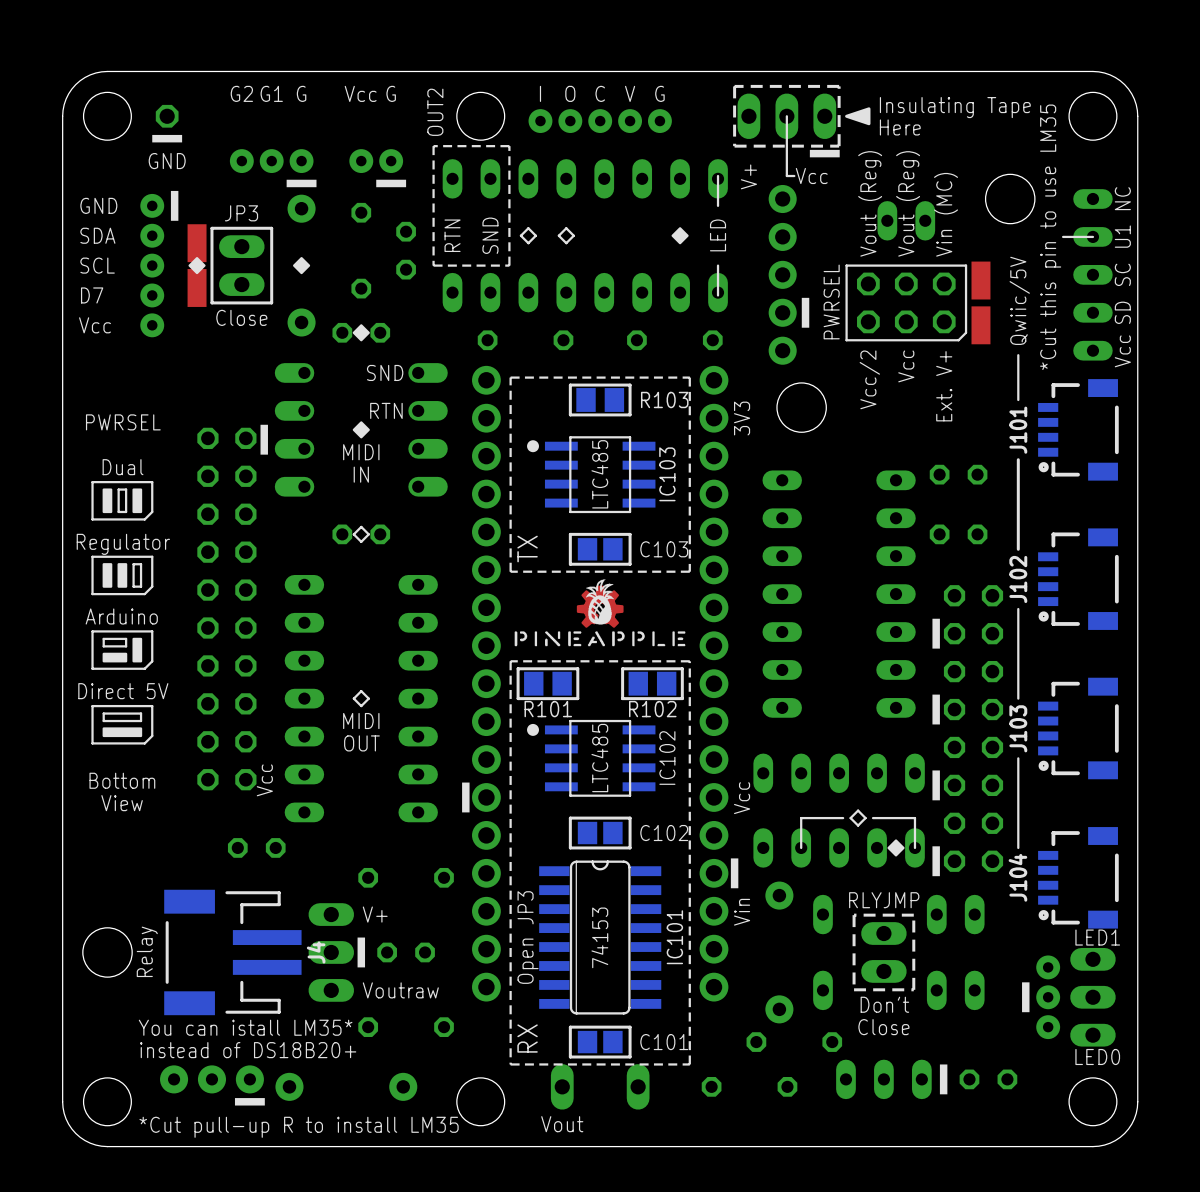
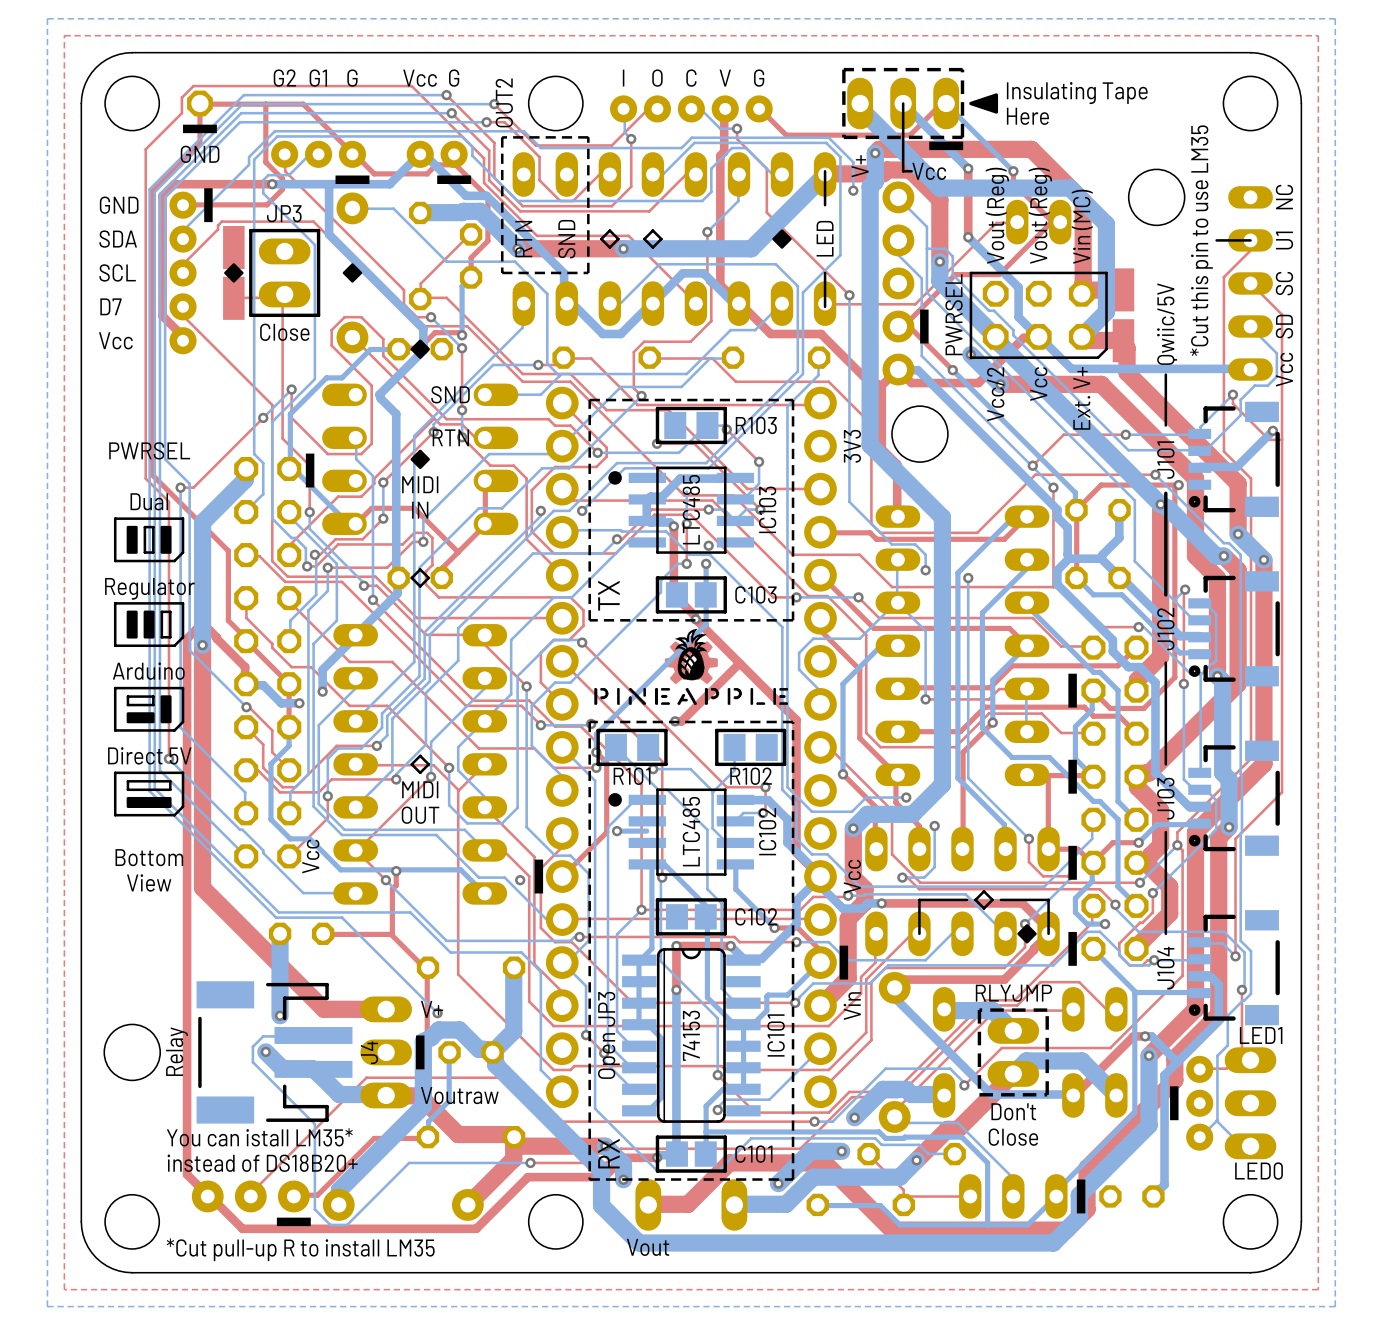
bottom zone outline: none -> (1335, 18) (47, 18) (47, 1306) (1335, 1306) (1335, 18)
top zone outline: none -> (1318, 35) (64, 35) (64, 1289) (1318, 1289) (1318, 35)
top track: none -> (446, 95) (494, 142) (494, 177) (522, 206) (611, 206) (631, 186) (631, 139)
bottom track: none -> (446, 95) (243, 95) (149, 189) (149, 791) (276, 917) (342, 917) (437, 1013)
via: none -> (446, 95)
top track: none -> (265, 104) (265, 162) (282, 179) (282, 189) (267, 204) (183, 205)
top track: none -> (494, 104) (535, 145) (611, 145) (648, 109) (657, 108)
bottom track: none -> (494, 104) (242, 104) (154, 191) (154, 788) (278, 912) (410, 912) (450, 952) (521, 952) (540, 971) (540, 1069) (562, 1091)
via: none -> (494, 104)
bottom track: none -> (860, 103) (861, 109) (939, 188) (1070, 188) (1106, 224) (1106, 312) (1081, 336)
bottom track: none -> (903, 103) (968, 168)
top track: none -> (946, 103) (941, 104) (910, 135) (786, 135) (759, 108)
bottom track: none -> (946, 103) (1013, 171)
bottom track: none -> (623, 108) (624, 132) (631, 139)
bottom track: none -> (691, 108) (700, 109) (720, 128) (737, 128)
top track: none -> (725, 108) (724, 151) (720, 155) (720, 284) (770, 333) (821, 333) (871, 384) (881, 385)
top track: none -> (451, 113) (489, 150) (489, 180) (520, 211) (649, 211) (685, 175) (695, 174)
bottom track: none -> (451, 113) (241, 113) (159, 194) (159, 770) (246, 856)
via: none -> (451, 113)
top track: none -> (486, 122) (504, 122) (539, 157) (539, 180) (560, 201) (573, 201) (598, 175) (609, 174)
bottom track: none -> (486, 122) (240, 122) (165, 197) (165, 459) (189, 483) (189, 650) (246, 707)
via: none -> (486, 122)
top track: none -> (737, 128) (737, 139) (766, 168) (766, 212) (849, 295)
via: none -> (737, 128)
via: none -> (631, 139)
top track: none -> (875, 153) (879, 149) (1031, 149) (1083, 201) (1081, 293) (1084, 290) (1123, 290)
bottom track: none -> (875, 153) (875, 181) (870, 186) (870, 445) (942, 517) (942, 784) (912, 814) (867, 814) (853, 828)
via: none -> (875, 153)
top track: none -> (284, 154) (285, 171) (403, 290) (403, 304) (416, 317) (431, 317)
bottom track: none -> (318, 154) (309, 154) (289, 175) (268, 175) (263, 180) (263, 193) (314, 244) (314, 379) (272, 421) (272, 518) (291, 538) (295, 538) (305, 548) (307, 566)
top track: none -> (454, 154) (453, 164) (436, 164) (427, 173) (374, 173) (303, 104) (199, 103) (199, 144) (152, 191) (152, 474) (228, 550) (228, 620) (246, 638) (246, 641)
top track: none -> (454, 154) (454, 163) (487, 197) (487, 241) (471, 257) (471, 277)
top track: none -> (968, 168) (968, 237)
via: none -> (968, 168)
top track: none -> (1013, 171) (1013, 182) (1052, 221) (1059, 222) (1050, 222) (999, 274) (955, 274) (903, 326) (898, 326)
via: none -> (1013, 171)
bottom track: none -> (652, 174) (663, 173) (694, 142) (826, 142) (840, 157) (840, 255) (802, 292) (802, 374) (708, 468) (624, 468) (582, 510)
bottom track: none -> (738, 174) (738, 201) (707, 231)
bottom track: none -> (782, 174) (771, 173) (746, 148) (731, 148) (711, 168) (711, 191) (702, 201) (517, 201) (472, 155) (472, 146) (462, 136) (277, 136) (254, 159) (254, 454) (263, 463) (263, 494) (246, 512)
top track: none -> (825, 174) (883, 173) (886, 170) (910, 170) (939, 199) (939, 261)
bottom track: none -> (825, 174) (751, 248) (623, 248)
top track: none -> (272, 184) (174, 184) (162, 195) (162, 315) (181, 335) (183, 340)
bottom track: none -> (272, 184) (389, 184) (416, 157) (420, 154) (424, 154) (465, 195) (486, 195) (564, 273) (564, 300) (567, 304) (573, 304) (602, 333) (620, 333) (682, 273) (703, 273) (733, 303) (738, 303)
via: none -> (272, 184)
bottom track: none -> (329, 184) (329, 234) (423, 328) (424, 349) (379, 394) (380, 398) (396, 414) (397, 593) (322, 669) (322, 691)
bottom track: none -> (853, 190) (853, 162) (828, 137) (691, 137) (681, 148) (540, 148) (524, 131) (274, 131) (249, 157) (249, 164) (183, 230) (183, 239)
via: none -> (853, 190)
bottom track: none -> (898, 197) (926, 226) (926, 292) (1134, 500) (1134, 561) (1192, 619) (1199, 620)
bottom track: none -> (352, 208) (393, 208) (446, 261) (515, 261) (547, 293) (547, 363) (559, 375)
bottom track: none -> (420, 212) (480, 211) (517, 248)
top track: none -> (1017, 222) (996, 222) (915, 304) (825, 303)
top track: none -> (707, 231) (707, 282) (711, 286) (711, 321) (690, 341) (644, 341) (633, 352) (633, 388) (641, 395)
via: none -> (707, 231)
top track: none -> (471, 234) (420, 283) (420, 299) (446, 297) (522, 374) (570, 374) (606, 410) (668, 410) (747, 488) (820, 489)
bottom track: none -> (968, 237) (1018, 287) (1018, 317) (1071, 368) (1250, 369)
via: none -> (968, 237)
bottom track: none -> (898, 240) (898, 255) (921, 278) (921, 355) (1053, 487)
top track: none -> (1250, 240) (1249, 251) (1223, 277) (1223, 451) (1251, 478) (1251, 758) (1177, 832) (1177, 845) (1182, 850) (1182, 975) (1110, 1048) (1001, 1048) (964, 1085)
via: none -> (517, 248)
top track: none -> (623, 248) (517, 248)
via: none -> (623, 248)
bottom track: none -> (926, 248) (945, 248) (952, 256) (952, 274) (988, 310) (994, 310) (1013, 330) (1013, 335) (1128, 450) (1205, 450) (1240, 415) (1240, 399) (1254, 385) (1267, 385) (1276, 376) (1276, 353) (1250, 326)
bottom track: none -> (939, 261) (939, 281) (995, 336) (1000, 344) (1160, 504) (1168, 508) (1216, 556) (1223, 556)
via: none -> (939, 261)
top track: none -> (183, 272) (183, 264) (218, 229) (218, 225) (221, 221) (313, 221) (418, 326) (467, 326) (522, 381) (570, 381) (684, 495) (733, 495) (792, 554) (859, 554) (892, 587) (1063, 587) (1103, 627) (1138, 627)
bottom track: none -> (471, 277) (462, 286) (462, 335)
top track: none -> (1250, 283) (1282, 314) (1282, 792) (1235, 838) (1235, 956)
bottom track: none -> (849, 295) (849, 501) (892, 544) (915, 544) (925, 554) (925, 570)
via: none -> (849, 295)
top track: none -> (233, 298) (281, 297) (284, 294) (282, 297) (282, 438) (309, 465) (309, 512)
bottom track: none -> (523, 303) (522, 327) (414, 436) (414, 661) (355, 721)
bottom track: none -> (609, 303) (620, 303) (659, 264) (775, 264) (797, 286) (797, 371) (706, 463) (617, 463) (569, 510) (553, 510) (429, 634) (429, 681) (392, 718) (392, 770) (355, 807)
top track: none -> (695, 303) (628, 235) (536, 235) (484, 182) (484, 158) (411, 86) (193, 86) (181, 97) (181, 113) (145, 149) (145, 478) (168, 501) (168, 758)
bottom track: none -> (782, 303) (755, 330) (730, 330) (686, 374) (561, 374) (540, 394) (484, 394)
top track: none -> (183, 306) (183, 315) (272, 405) (272, 561) (287, 576) (375, 576) (416, 618) (562, 618)
bottom track: none -> (431, 317) (462, 348)
via: none -> (431, 317)
top track: none -> (898, 326) (907, 324) (952, 370)
top track: none -> (462, 335) (459, 332) (434, 332) (419, 348) (398, 349)
via: none -> (462, 335)
top track: none -> (1038, 336) (1023, 337) (978, 383) (911, 383) (898, 369) (881, 385)
top track: none -> (1081, 336) (1084, 340) (1123, 340) (1127, 348) (1127, 372) (1238, 483) (1238, 534)
top track: none -> (352, 337) (440, 424) (462, 424) (475, 437) (484, 437)
top track: none -> (462, 348) (462, 410)
via: none -> (462, 348)
bottom track: none -> (398, 349) (370, 349) (342, 377) (326, 377) (290, 414) (289, 469) (292, 468) (348, 523) (355, 523)
bottom track: none -> (970, 354) (1000, 384)
via: none -> (970, 354)
top track: none -> (649, 357) (712, 358) (735, 381) (828, 381) (871, 424) (871, 523) (880, 532) (977, 532) (1035, 474) (1155, 474)
bottom track: none -> (733, 357) (710, 358) (681, 386) (620, 386) (553, 454) (489, 454) (423, 519) (423, 541)
bottom track: none -> (819, 357) (818, 375) (787, 406) (787, 787) (812, 811) (852, 811) (866, 797) (906, 797)
top track: none -> (538, 364) (556, 364) (563, 357) (591, 358) (637, 405) (818, 405) (820, 403)
bottom track: none -> (538, 364) (493, 364) (433, 424) (433, 432)
via: none -> (538, 364)
bottom track: none -> (898, 369) (917, 370) (1057, 509) (1057, 517) (1067, 527) (1068, 558)
bottom track: none -> (952, 370) (1075, 492) (1076, 510)
via: none -> (952, 370)
top track: none -> (1000, 384) (1101, 384) (1195, 478) (1195, 556) (1217, 578) (1217, 676)
via: none -> (1000, 384)
top track: none -> (881, 385) (881, 448) (897, 464) (897, 516)
top track: none -> (291, 389) (291, 417) (327, 454) (361, 454) (371, 443) (371, 385) (331, 345) (331, 330) (344, 317) (361, 317) (383, 339) (383, 355) (446, 419) (548, 419) (555, 425) (570, 425) (597, 452)
bottom track: none -> (291, 389) (263, 417)
via: none -> (291, 389)
top track: none -> (1232, 394) (1232, 403) (1269, 439) (1282, 439)
bottom track: none -> (1232, 394) (1200, 426) (1199, 434) (1125, 434)
via: none -> (1232, 394)
bottom track: none -> (641, 395) (569, 468) (542, 468) (502, 508) (478, 508) (419, 567) (419, 676) (382, 713) (382, 727) (361, 748) (338, 748) (327, 758) (327, 796)
via: none -> (641, 395)
top track: none -> (562, 403) (606, 447) (606, 456) (596, 466) (555, 466) (531, 490) (531, 531) (553, 553) (615, 553) (654, 514) (690, 514) (773, 597) (796, 597)
bottom track: none -> (462, 410) (462, 437)
via: none -> (462, 410)
top track: none -> (263, 417) (193, 487) (180, 487)
via: none -> (263, 417)
top track: none -> (434, 418) (374, 478) (374, 483) (361, 496) (338, 496) (290, 544) (289, 555)
top track: none -> (726, 429) (759, 461)
bottom track: none -> (726, 429) (722, 425) (706, 425) (679, 452) (597, 452)
via: none -> (726, 429)
bottom track: none -> (1272, 430) (1236, 466) (1199, 467)
via: none -> (1272, 430)
top track: none -> (433, 432) (383, 482)
via: none -> (433, 432)
top track: none -> (1125, 434) (1063, 434) (1032, 465)
via: none -> (1125, 434)
bottom track: none -> (355, 437) (356, 459) (373, 476) (373, 599)
top track: none -> (462, 437) (490, 465) (513, 465) (526, 478) (526, 539) (562, 575)
via: none -> (462, 437)
top track: none -> (657, 443) (694, 443) (760, 509)
via: none -> (657, 443)
via: none -> (597, 452)
bottom track: none -> (759, 461) (759, 483) (743, 499) (735, 499)
via: none -> (759, 461)
via: none -> (1032, 465)
bottom track: none -> (246, 469) (245, 479) (202, 522) (202, 645)
bottom track: none -> (1155, 474) (1223, 543) (1229, 543) (1240, 554) (1240, 940) (1251, 951) (1251, 993) (1227, 1015) (1227, 1045) (1217, 1055) (1217, 1120) (1199, 1137)
via: none -> (1155, 474)
bottom track: none -> (735, 477) (680, 478) (662, 496) (650, 496) (647, 499) (647, 520) (669, 522) (673, 526)
top track: none -> (484, 480) (485, 523) (442, 567) (441, 577)
bottom track: none -> (383, 482) (383, 518)
via: none -> (383, 482)
via: none -> (1178, 485)
bottom track: none -> (180, 487) (180, 727) (245, 792) (246, 813)
via: none -> (180, 487)
top track: none -> (1053, 487) (1053, 587)
via: none -> (1053, 487)
top track: none -> (562, 489) (573, 500) (712, 500) (808, 596) (827, 596) (866, 634) (866, 732) (880, 747) (955, 747) (988, 713) (1041, 713) (1061, 732) (1093, 733)
bottom track: none -> (686, 491) (686, 523)
top track: none -> (1160, 504) (1160, 656) (1137, 680) (1136, 690)
via: none -> (1160, 504)
top track: none -> (708, 509) (651, 509) (622, 539) (617, 539)
via: none -> (708, 509)
bottom track: none -> (760, 509) (746, 509) (735, 520) (724, 509) (708, 509)
via: none -> (760, 509)
bottom track: none -> (1119, 510) (1119, 538) (1102, 554) (1101, 558)
bottom track: none -> (540, 510) (540, 516) (424, 632) (424, 678) (387, 716) (387, 735) (376, 745)
via: none -> (540, 510)
via: none -> (582, 510)
bottom track: none -> (289, 512) (290, 517) (336, 563) (336, 620) (313, 643) (313, 806) (342, 834) (436, 834) (478, 877) (504, 877) (546, 918) (562, 919)
bottom track: none -> (309, 512) (309, 528) (363, 583) (363, 585)
via: none -> (309, 512)
top track: none -> (1027, 516) (1004, 539) (876, 539) (870, 532) (820, 532)
bottom track: none -> (1027, 516) (1013, 517) (957, 572) (957, 778) (1004, 824) (1005, 849)
top track: none -> (383, 518) (362, 539) (335, 539) (320, 554) (314, 554)
via: none -> (383, 518)
top track: none -> (355, 523) (371, 508) (414, 508) (458, 552)
top track: none -> (686, 523) (686, 563)
via: none -> (686, 523)
top track: none -> (673, 526) (673, 594) (796, 720) (796, 853) (820, 876)
via: none -> (673, 526)
bottom track: none -> (562, 532) (564, 530) (666, 531) (689, 554) (710, 554) (782, 627) (782, 789) (796, 804) (796, 838) (812, 854) (827, 854) (859, 886) (1044, 886) (1092, 838) (1093, 819)
bottom track: none -> (1238, 534) (1263, 559)
via: none -> (1238, 534)
bottom track: none -> (617, 539) (602, 553) (533, 553) (458, 628) (458, 660) (425, 692) (425, 744) (396, 774) (396, 779)
via: none -> (617, 539)
top track: none -> (423, 541) (413, 541) (387, 567) (327, 567)
via: none -> (423, 541)
bottom track: none -> (647, 542) (626, 543) (571, 597) (553, 597) (511, 640) (511, 694) (458, 747) (458, 770) (484, 796) (484, 807)
via: none -> (708, 545)
bottom track: none -> (314, 554) (316, 594) (290, 620) (289, 641)
via: none -> (314, 554)
top track: none -> (246, 555) (259, 556) (285, 581) (342, 581) (465, 705) (521, 705) (540, 725)
top track: none -> (1223, 556) (1238, 570) (1238, 683) (1149, 773) (1136, 776) (1137, 787) (1160, 810) (1160, 845) (1150, 855) (1146, 863)
via: none -> (1223, 556)
bottom track: none -> (1068, 558) (1057, 570) (1057, 584) (1112, 640) (1112, 651) (1128, 667) (1139, 667) (1155, 682) (1155, 773) (1189, 806) (1199, 806)
bottom track: none -> (1101, 558) (1068, 558)
bottom track: none -> (1101, 558) (1180, 636) (1199, 637)
bottom track: none -> (897, 559) (897, 602)
bottom track: none -> (1027, 559) (1026, 569) (982, 612) (982, 727) (1012, 757) (1049, 757) (1093, 801) (1099, 801) (1118, 819) (1118, 886) (1136, 905)
top track: none -> (1263, 559) (1263, 763) (1195, 832) (1195, 1009) (1149, 1055)
via: none -> (1263, 559)
bottom track: none -> (686, 563) (677, 563) (660, 580) (660, 592) (570, 682) (555, 682) (531, 705) (531, 745) (561, 775) (562, 790)
via: none -> (686, 563)
bottom track: none -> (706, 563) (706, 624) (596, 734) (596, 752)
via: none -> (706, 563)
top track: none -> (307, 566) (316, 566) (338, 544) (402, 544) (414, 532) (427, 532) (432, 538) (432, 565) (425, 571) (425, 584) (438, 597) (570, 597) (583, 610) (583, 625) (569, 640) (553, 640) (540, 652) (540, 682) (562, 704)
via: none -> (307, 566)
bottom track: none -> (327, 567) (327, 590) (308, 610) (308, 774) (290, 792) (289, 813)
via: none -> (327, 567)
via: none -> (925, 570)
top track: none -> (820, 575) (873, 628) (1009, 628) (1027, 645)
bottom track: none -> (968, 578) (968, 778) (1028, 838)
via: none -> (968, 578)
top track: none -> (1076, 577) (1076, 510) (1101, 485) (1178, 485) (1174, 486) (1174, 677) (1143, 708) (1110, 708) (1093, 690)
bottom track: none -> (1076, 578) (1093, 594) (1121, 594) (1180, 652) (1199, 654)
top track: none -> (363, 585) (376, 585) (425, 634) (484, 635) (485, 645) (526, 686)
via: none -> (363, 585)
top track: none -> (1185, 589) (1183, 683)
bottom track: none -> (1185, 589) (1174, 600)
via: none -> (1185, 589)
via: none -> (796, 597)
top track: none -> (858, 597) (879, 618) (1032, 618) (1061, 646) (1093, 647)
bottom track: none -> (858, 597) (796, 597)
via: none -> (858, 597)
top track: none -> (246, 598) (246, 618) (291, 667) (311, 667) (349, 705) (387, 705) (449, 767)
top track: none -> (289, 598) (290, 602) (349, 661) (392, 661) (478, 748) (534, 748) (553, 767) (596, 767)
top track: none -> (373, 599) (473, 700) (529, 700) (555, 726) (580, 726) (641, 784) (641, 909) (800, 909) (813, 896) (848, 895)
via: none -> (373, 599)
bottom track: none -> (897, 602) (925, 630) (925, 699)
bottom track: none -> (897, 602) (859, 638) (813, 638) (799, 652) (799, 669) (819, 690) (820, 704)
bottom track: none -> (1027, 602) (1027, 606) (1093, 672) (1099, 672) (1118, 690) (1118, 801) (1136, 819)
bottom track: none -> (1199, 603) (1205, 603) (1216, 614) (1216, 660) (1200, 674) (1199, 772)
top track: none -> (820, 618) (821, 630) (859, 669) (859, 738) (897, 774) (895, 776) (895, 802) (919, 825) (919, 849)
via: none -> (695, 619)
bottom track: none -> (1138, 627) (1143, 627) (1190, 673) (1201, 674)
via: none -> (1138, 627)
top track: none -> (246, 641) (289, 684) (289, 727)
top track: none -> (582, 642) (726, 787) (765, 787) (765, 810) (762, 813)
bottom track: none -> (582, 642) (579, 640) (553, 640) (517, 676) (517, 807) (502, 823) (467, 823) (449, 805) (449, 767)
via: none -> (582, 642)
top track: none -> (202, 645) (202, 887) (323, 1009) (385, 1009)
via: none -> (202, 645)
bottom track: none -> (897, 645) (880, 646) (843, 683) (843, 774)
bottom track: none -> (1027, 645) (992, 680) (992, 722)
top track: none -> (1136, 647) (1118, 665) (1012, 665) (990, 687) (897, 688)
top track: none -> (562, 661) (662, 761) (662, 877)
top track: none -> (739, 663) (681, 721) (675, 721)
bottom track: none -> (1217, 676) (1222, 681) (1222, 773) (1229, 779) (1229, 827)
via: none -> (1217, 676)
bottom track: none -> (355, 678) (354, 689) (318, 725) (318, 804) (344, 829) (464, 829) (484, 850)
bottom track: none -> (484, 678) (484, 689) (431, 742) (431, 776)
bottom track: none -> (1183, 683) (1183, 779) (1192, 788) (1205, 789) (1216, 800) (1216, 829) (1152, 893)
via: none -> (1183, 683)
top track: none -> (246, 684) (245, 667) (209, 629) (196, 629) (187, 638) (187, 1174) (242, 1228) (476, 1228) (527, 1177) (604, 1177) (623, 1157) (657, 1157)
bottom track: none -> (246, 684) (263, 685) (281, 703) (299, 703)
bottom track: none -> (526, 686) (526, 827) (555, 855) (570, 855) (588, 873) (588, 940) (565, 964) (562, 962) (586, 986) (586, 1035)
via: none -> (526, 686)
top track: none -> (1027, 688) (999, 689) (988, 699) (925, 699)
bottom track: none -> (1027, 688) (1027, 731)
bottom track: none -> (1093, 690) (1092, 709) (1075, 726) (1075, 758) (1093, 776)
via: none -> (322, 691)
via: none -> (925, 699)
via: none -> (299, 703)
top track: none -> (246, 707) (249, 707) (272, 730) (272, 752) (289, 770)
via: none -> (246, 707)
via: none -> (675, 721)
top track: none -> (992, 722) (963, 752) (962, 849)
via: none -> (992, 722)
bottom track: none -> (591, 723) (540, 725)
via: none -> (591, 723)
via: none -> (540, 725)
top track: none -> (246, 727) (263, 744) (263, 767) (282, 787) (295, 787) (336, 745) (376, 745)
bottom track: none -> (289, 727) (289, 745) (270, 763) (270, 819) (290, 838) (309, 838) (340, 869) (460, 869) (484, 893)
top track: none -> (897, 731) (960, 731) (985, 707) (1084, 707) (1093, 716) (1119, 716) (1136, 733)
via: none -> (376, 745)
bottom track: none -> (562, 747) (595, 780) (595, 1108) (657, 1170) (719, 1170) (751, 1138) (875, 1138) (881, 1144) (919, 1144) (928, 1153) (954, 1154)
bottom track: none -> (734, 747) (734, 770) (712, 792) (712, 828) (726, 842) (735, 842)
top track: none -> (820, 747) (830, 748) (892, 810) (892, 854) (920, 882) (1139, 882)
top track: none -> (596, 752) (606, 762) (606, 832) (562, 876)
via: none -> (596, 752)
bottom track: none -> (168, 758) (263, 850) (263, 853) (303, 893) (355, 893)
via: none -> (168, 758)
top track: none -> (355, 764) (433, 765) (458, 790)
top track: none -> (484, 764) (458, 791) (458, 974) (553, 1069) (570, 1069) (574, 1066) (721, 1066) (725, 1069) (828, 1069) (866, 1032) (866, 979) (911, 934) (919, 933)
via: none -> (449, 767)
bottom track: none -> (596, 767) (615, 747) (658, 789) (667, 789) (707, 829) (707, 889) (721, 903) (721, 988) (735, 1002) (743, 1003)
via: none -> (596, 767)
bottom track: none -> (653, 769) (690, 769) (713, 791)
via: none -> (653, 769)
top track: none -> (246, 770) (258, 770) (280, 792) (318, 792) (331, 779) (396, 779)
top track: none -> (843, 774) (875, 806) (876, 849)
via: none -> (843, 774)
top track: none -> (431, 776) (355, 850) (385, 880)
via: none -> (431, 776)
top track: none -> (1093, 776) (1027, 774) (1048, 776) (1048, 849) (1078, 849) (1093, 862) (1112, 842) (1138, 842)
via: none -> (396, 779)
via: none -> (765, 787)
top track: none -> (327, 796) (327, 818) (289, 856)
via: none -> (327, 796)
via: none -> (906, 797)
bottom track: none -> (647, 799) (635, 800) (608, 827) (608, 1044) (631, 1067) (639, 1067)
bottom track: none -> (735, 799) (768, 800) (787, 819) (787, 842) (820, 876)
top track: none -> (484, 807) (534, 856) (534, 964) (561, 991) (562, 1005)
bottom track: none -> (762, 813) (743, 813) (735, 821)
via: none -> (762, 813)
bottom track: none -> (1199, 823) (1156, 824) (1138, 842)
bottom track: none -> (934, 825) (934, 867) (924, 877) (902, 877)
via: none -> (934, 825)
top track: none -> (1229, 827) (1218, 837) (1218, 1014) (1174, 1058) (1174, 1080) (1087, 1168) (1087, 1209) (1066, 1230) (892, 1230) (824, 1162) (729, 1162) (688, 1204) (648, 1204)
via: none -> (1229, 827)
top track: none -> (853, 828) (853, 877) (864, 889) (864, 902) (848, 918) (848, 978) (820, 1005)
via: none -> (853, 828)
via: none -> (617, 831)
bottom track: none -> (646, 831) (617, 831)
top track: none -> (562, 833) (561, 847) (540, 868) (540, 927) (555, 942) (571, 942) (632, 1002) (795, 1002)
top track: none -> (1028, 838) (1028, 862) (1043, 876) (1067, 876) (1070, 873)
via: none -> (1028, 838)
via: none -> (1138, 842)
bottom track: none -> (1177, 845) (1139, 882)
via: none -> (1177, 845)
top track: none -> (484, 850) (503, 850) (529, 876) (529, 1001) (553, 1026) (828, 1026) (861, 993) (861, 977) (875, 962) (876, 933)
bottom track: none -> (1093, 862) (1092, 881) (1075, 898) (1075, 912) (1087, 924) (1105, 924)
top track: none -> (1146, 863) (1169, 886) (1169, 913) (1136, 948)
bottom track: none -> (735, 864) (735, 889) (774, 927)
top track: none -> (396, 871) (396, 885) (392, 889) (391, 934)
via: none -> (396, 871)
bottom track: none -> (1070, 873) (1070, 878) (1025, 924)
bottom track: none -> (820, 876) (796, 900) (796, 924) (761, 958) (743, 960) (730, 946)
bottom track: none -> (820, 876) (818, 884) (843, 908) (862, 908) (867, 903) (881, 903)
bottom track: none -> (662, 877) (660, 961) (717, 1018) (717, 1075)
via: none -> (662, 877)
top track: none -> (902, 877) (907, 877) (919, 889) (1099, 889) (1115, 904)
via: none -> (902, 877)
bottom track: none -> (385, 880) (446, 940) (570, 940) (574, 936) (579, 936)
via: none -> (385, 880)
via: none -> (520, 880)
via: none -> (1139, 882)
top track: none -> (1152, 893) (1152, 912) (1119, 943) (1119, 955) (1129, 965) (1142, 965) (1147, 960) (1154, 960)
via: none -> (1152, 893)
bottom track: none -> (848, 895) (965, 894) (1005, 933)
via: none -> (848, 895)
top track: none -> (881, 903) (1022, 903) (1045, 926) (1048, 933) (1004, 979) (903, 979) (894, 987)
via: none -> (881, 903)
bottom track: none -> (1115, 904) (1115, 908) (1138, 931) (1223, 931) (1244, 952) (1244, 987) (1241, 989)
via: none -> (1115, 904)
top track: none -> (1093, 905) (1092, 922) (1014, 1000) (986, 1000) (894, 1091) (849, 1091) (828, 1112) (755, 1112) (717, 1075)
bottom track: none -> (641, 909) (617, 934) (617, 1031) (631, 1045) (639, 1046)
via: none -> (641, 909)
top track: none -> (820, 919) (562, 919)
top track: none -> (1025, 924) (1025, 947) (1004, 967) (885, 967) (871, 982) (871, 1040) (820, 1091)
via: none -> (1025, 924)
via: none -> (1105, 924)
top track: none -> (774, 927) (797, 927) (819, 949) (820, 962)
via: none -> (774, 927)
bottom track: none -> (280, 933) (280, 1015)
top track: none -> (323, 933) (391, 934)
bottom track: none -> (962, 933) (951, 934) (925, 960) (846, 960) (828, 942) (796, 942)
top track: none -> (391, 934) (424, 967) (428, 967) (427, 1051)
top track: none -> (579, 936) (734, 936) (739, 942) (796, 942)
via: none -> (579, 936)
via: none -> (796, 942)
bottom track: none -> (1199, 942) (1222, 943) (1235, 956)
via: none -> (676, 946)
top track: none -> (730, 946) (676, 946) (676, 989)
via: none -> (730, 946)
bottom track: none -> (1093, 948) (1136, 992)
via: none -> (1235, 956)
bottom track: none -> (1199, 959) (1154, 960) (1149, 965) (1129, 965) (1119, 955) (1119, 951) (1099, 931) (1087, 931) (1053, 965) (888, 965) (870, 983) (813, 983) (795, 1002)
bottom track: none -> (639, 960) (651, 948) (651, 865) (647, 864) (664, 864) (704, 904) (704, 916) (707, 918) (707, 997) (733, 1023) (752, 1024) (766, 1010) (768, 995) (787, 995) (820, 962)
bottom track: none -> (638, 960) (639, 1024) (648, 1024) (662, 1039) (662, 1097) (649, 1110) (639, 1110)
via: none -> (1154, 960)
bottom track: none -> (514, 967) (513, 1031) (492, 1052)
bottom track: none -> (1199, 976) (1210, 977) (1218, 984) (1218, 1020) (1164, 1075) (1164, 1184) (1153, 1196)
bottom track: none -> (894, 987) (895, 998) (991, 1094) (1073, 1095)
bottom track: none -> (676, 989) (676, 1154) (659, 1155) (657, 1157)
via: none -> (676, 989)
top track: none -> (1241, 989) (1241, 1051) (1250, 1060) (1241, 1053) (1226, 1068) (1199, 1069)
via: none -> (1241, 989)
bottom track: none -> (1136, 992) (1199, 993)
bottom track: none -> (1136, 992) (1134, 1112) (1057, 1190) (1056, 1196) (1027, 1224) (899, 1224) (880, 1205) (817, 1204)
via: none -> (795, 1002)
bottom track: none -> (944, 1009) (992, 1010) (1013, 1030)
top track: none -> (1073, 1009) (995, 1010) (895, 1110) (894, 1116)
top track: none -> (1116, 1009) (1106, 1009) (1079, 982) (1040, 982) (1017, 1005) (988, 1005) (897, 1097) (852, 1097) (800, 1148) (620, 1148) (606, 1162) (530, 1162)
via: none -> (437, 1013)
via: none -> (280, 1015)
bottom track: none -> (743, 1024) (743, 1089) (722, 1089) (706, 1106) (705, 1154)
bottom track: none -> (313, 1035) (263, 1036) (252, 1046) (252, 1062) (314, 1124) (314, 1209) (330, 1224) (347, 1224) (409, 1162) (530, 1162)
top track: none -> (586, 1035) (604, 1053)
via: none -> (586, 1035)
top track: none -> (1145, 1036) (1133, 1036) (1073, 1095)
bottom track: none -> (1145, 1036) (1151, 1036) (1177, 1062)
via: none -> (1145, 1036)
bottom track: none -> (820, 1048) (769, 1099) (725, 1099) (717, 1107) (717, 1110)
bottom track: none -> (265, 1051) (282, 1068) (313, 1069) (339, 1094) (386, 1095)
via: none -> (265, 1051)
bottom track: none -> (449, 1052) (449, 1100) (428, 1121) (428, 1137)
bottom track: none -> (492, 1052) (478, 1049) (459, 1029) (438, 1029) (431, 1037) (423, 1041) (423, 1106) (339, 1190) (338, 1204)
bottom track: none -> (492, 1052) (495, 1064) (601, 1170) (601, 1205) (638, 1243) (1053, 1243) (1079, 1217) (1079, 1195) (1149, 1125) (1149, 1055)
bottom track: none -> (604, 1053) (604, 1060) (631, 1088) (639, 1089)
via: none -> (604, 1053)
via: none -> (1149, 1055)
top track: none -> (1013, 1073) (957, 1129) (947, 1129) (916, 1160)
bottom track: none -> (1013, 1073) (1026, 1060) (1081, 1060) (1116, 1095)
via: none -> (717, 1075)
bottom track: none -> (964, 1085) (964, 1082) (950, 1068) (885, 1068) (832, 1121) (814, 1121)
via: none -> (964, 1085)
top track: none -> (386, 1095) (419, 1095) (458, 1134) (505, 1134) (514, 1137) (513, 1159) (467, 1204)
bottom track: none -> (944, 1095) (911, 1094) (906, 1089) (883, 1089) (854, 1117)
via: none -> (717, 1110)
bottom track: none -> (894, 1116) (901, 1122) (957, 1122) (1012, 1177) (1013, 1196)
via: none -> (854, 1117)
bottom track: none -> (1216, 1120) (1241, 1146) (1250, 1146)
top track: none -> (814, 1121) (555, 1121) (511, 1077) (366, 1077) (251, 1192) (250, 1196)
via: none -> (814, 1121)
bottom track: none -> (706, 1131) (879, 1131) (885, 1138) (961, 1137) (987, 1162) (987, 1224)
top track: none -> (428, 1137) (374, 1138) (317, 1195) (293, 1196)
top track: none -> (605, 1146) (513, 1146)
bottom track: none -> (605, 1146) (623, 1164) (623, 1179)
via: none -> (605, 1146)
bottom track: none -> (841, 1151) (810, 1151) (778, 1183)
via: none -> (841, 1151)
top track: none -> (868, 1154) (903, 1190) (903, 1204) (903, 1204) (903, 1196) (969, 1196) (970, 1196)
via: none -> (657, 1157)
bottom track: none -> (916, 1160) (899, 1177) (813, 1177) (786, 1204) (734, 1204)
via: none -> (916, 1160)
via: none -> (530, 1162)
via: none -> (623, 1179)
via: none -> (778, 1183)

